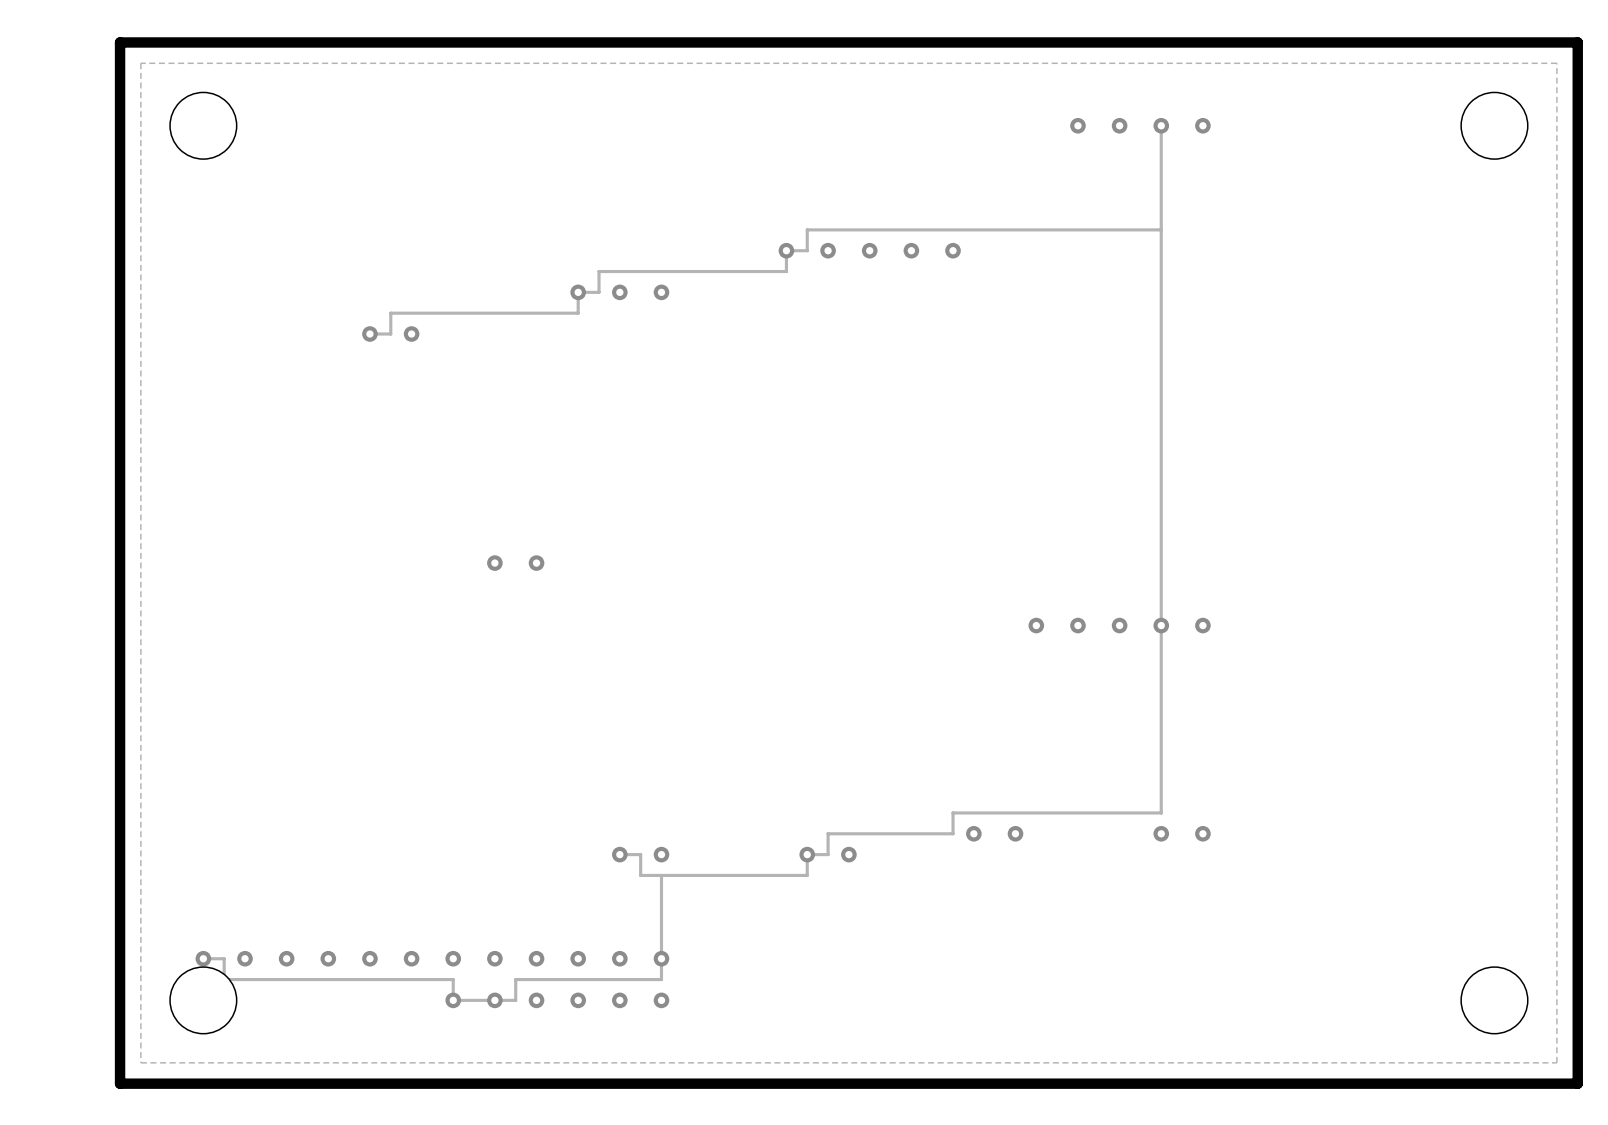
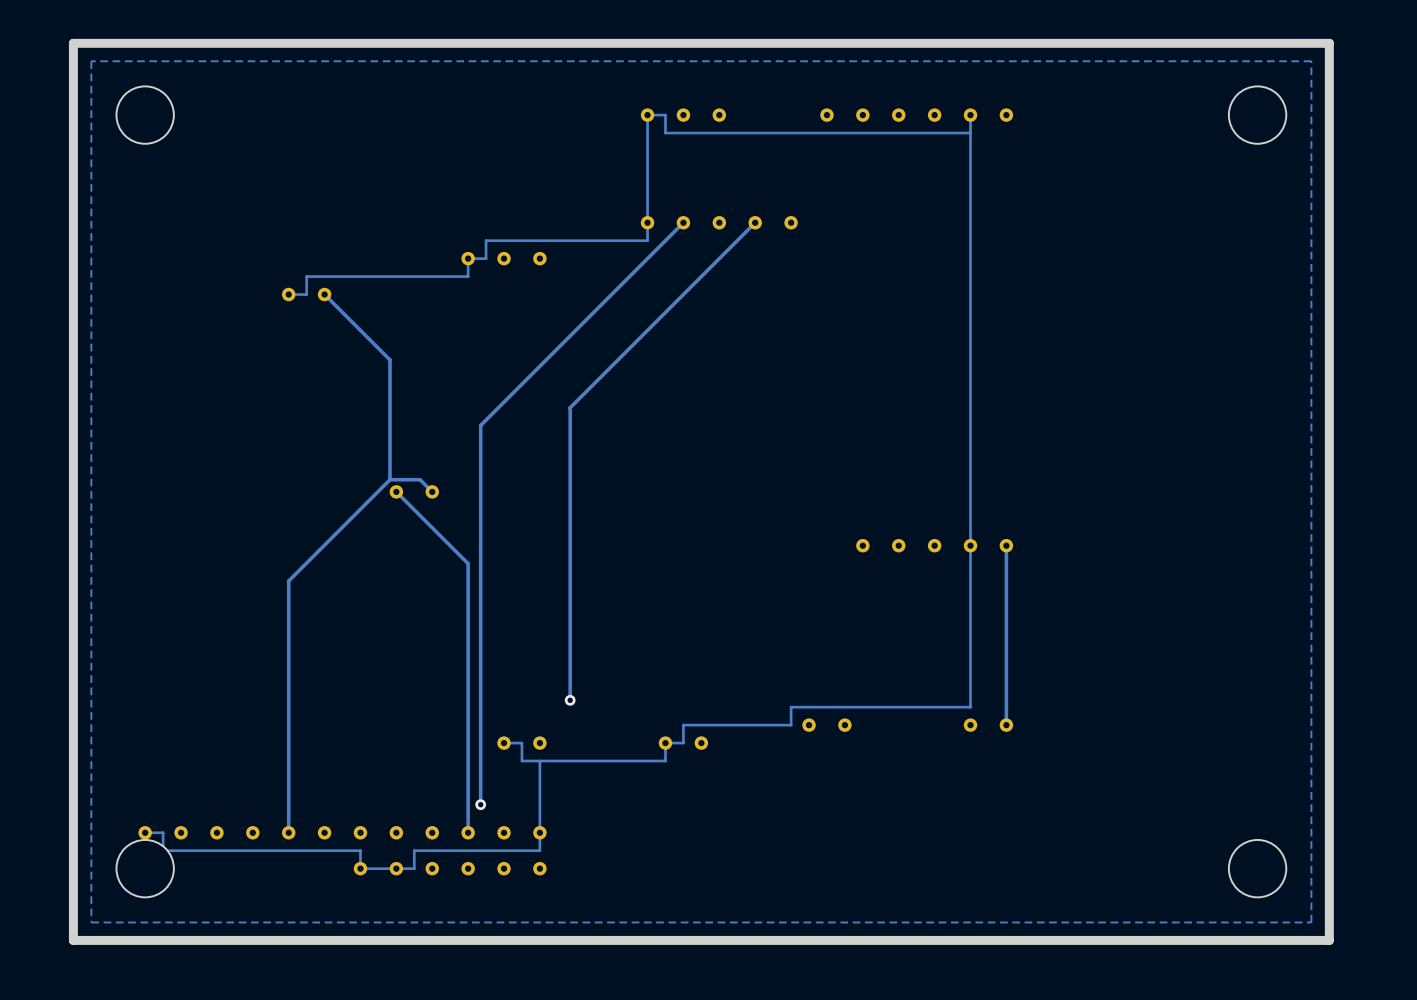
part: none -> (683, 115)
part: none -> (844, 115)
track: (1161, 229) (807, 229) (807, 250) (786, 250) -> (970, 133) (665, 133) (665, 115) (647, 115) (647, 222)
track: none -> (683, 222) (480, 425) (480, 804)
track: none -> (755, 222) (570, 407) (570, 700)
track: none -> (324, 294) (389, 359) (389, 479)
track: none -> (389, 479) (288, 581) (288, 832)
track: none -> (389, 479) (420, 479) (432, 491)
track: none -> (396, 491) (468, 563) (468, 832)
track: none -> (1006, 545) (1006, 725)
via: none -> (570, 700)
via: none -> (480, 804)

